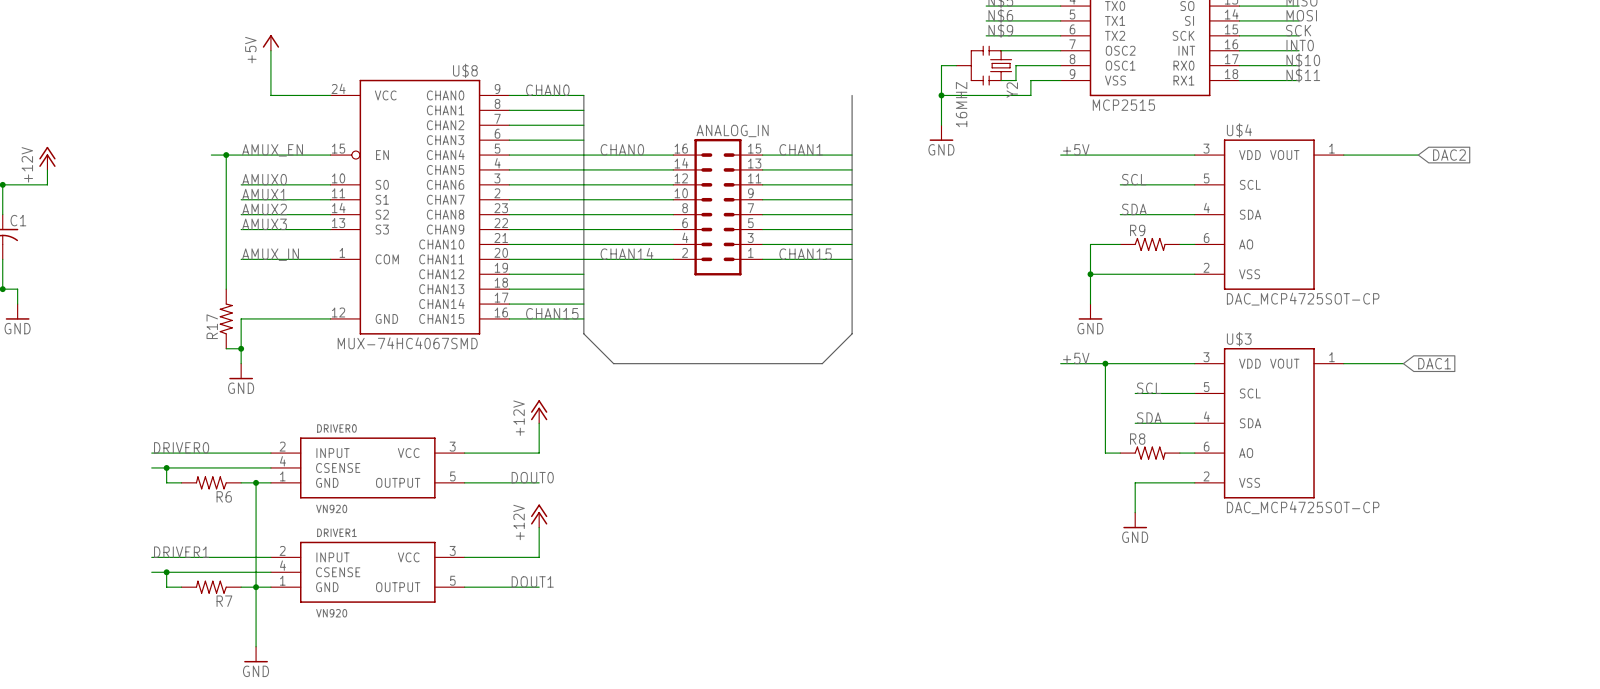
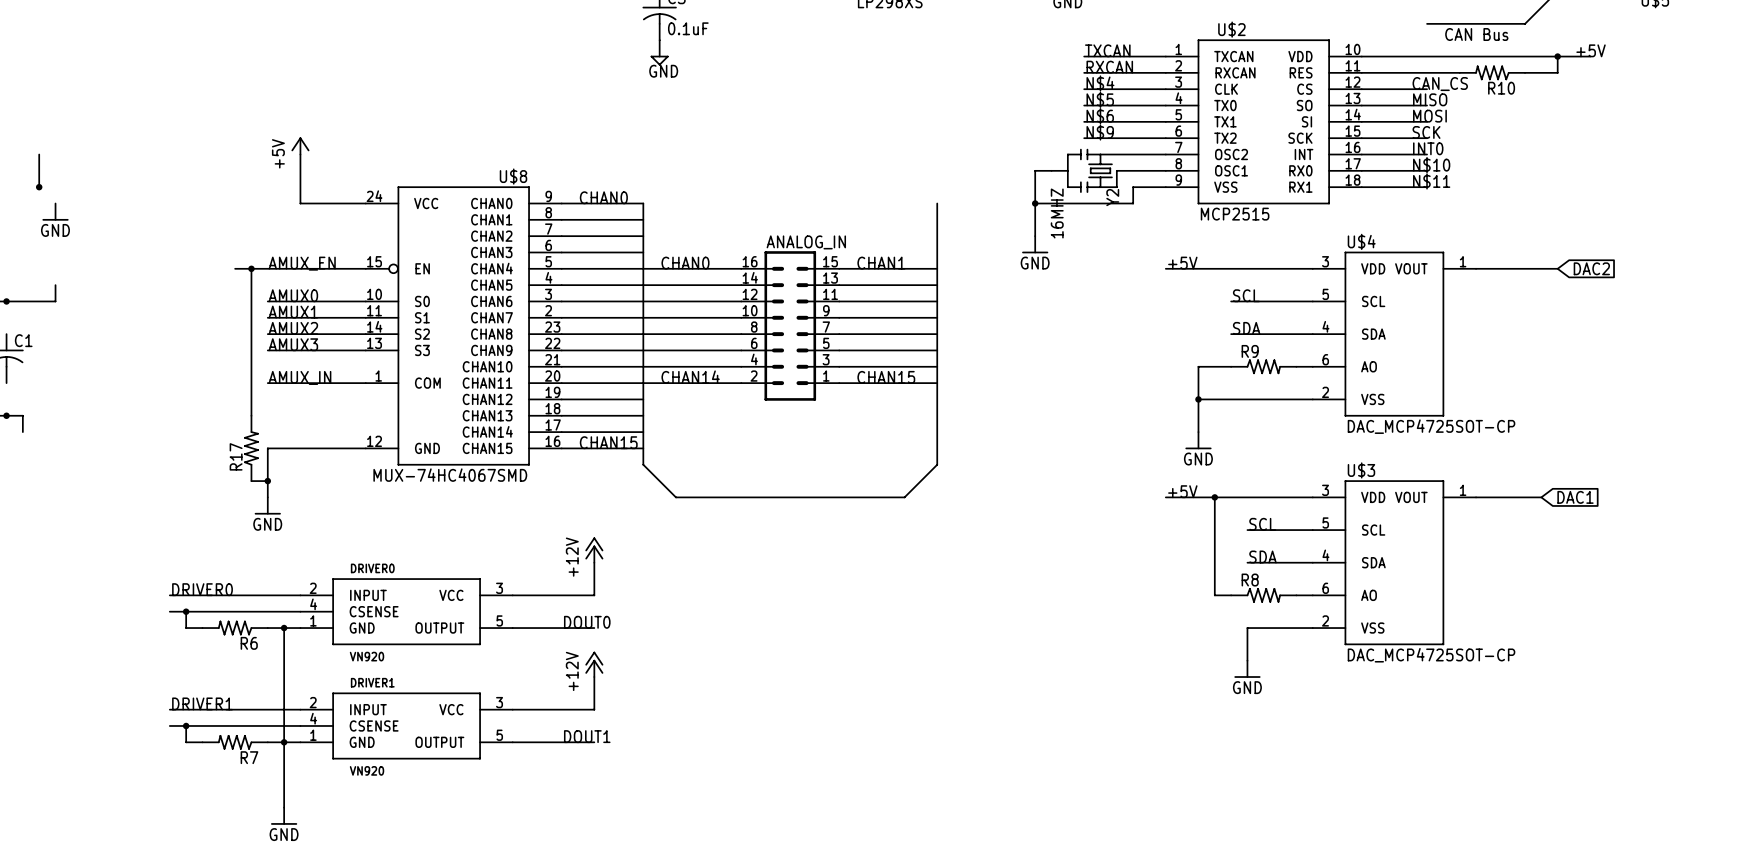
junction: none -> (39, 187)
power symbol: none -> GND (55, 212)
power symbol: +12V (47, 158) -> none
wire: (2, 184) (2, 214) -> (39, 154) (39, 187)
wire: (2, 259) (2, 289) -> none
power symbol: GND (17, 311) -> none

